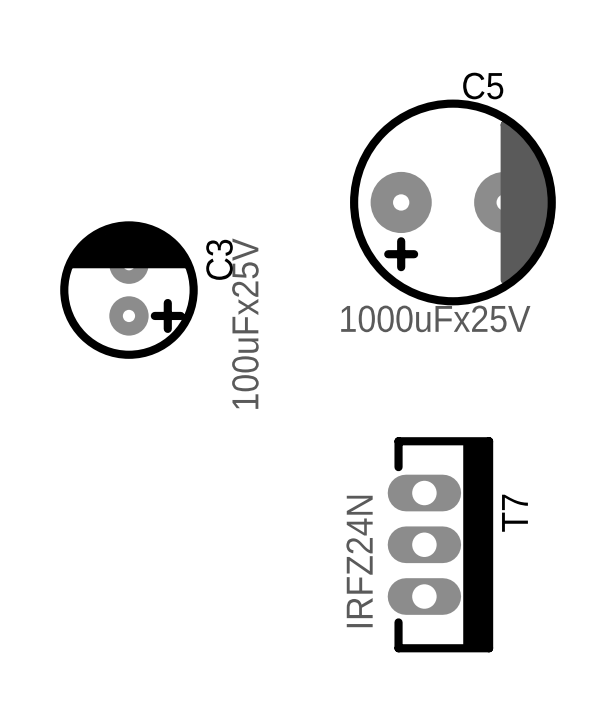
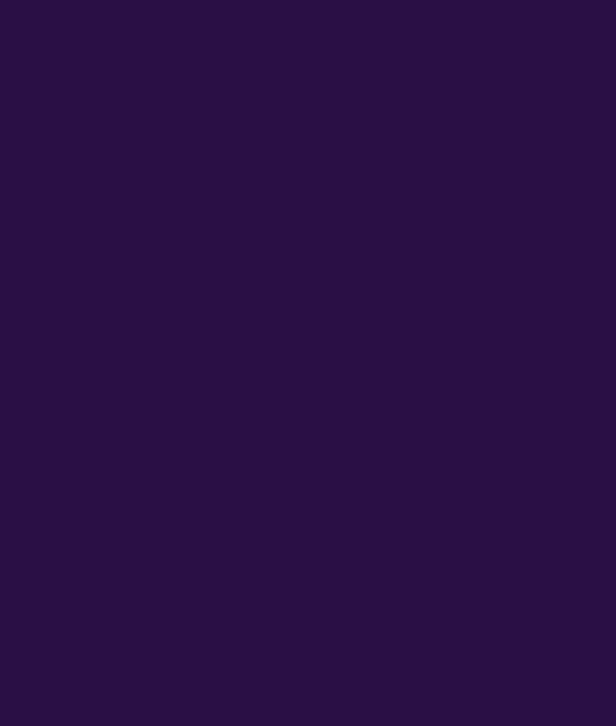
C5: 1000uFx25V (452, 202) -> none
C3: 100uFx25V (128, 290) -> none
T7: IRFZ24N (440, 544) -> none

